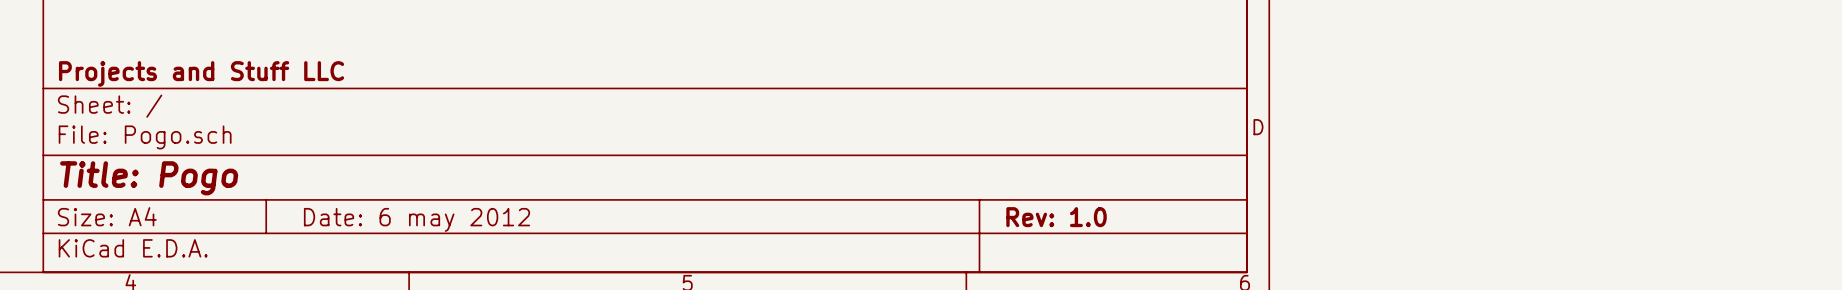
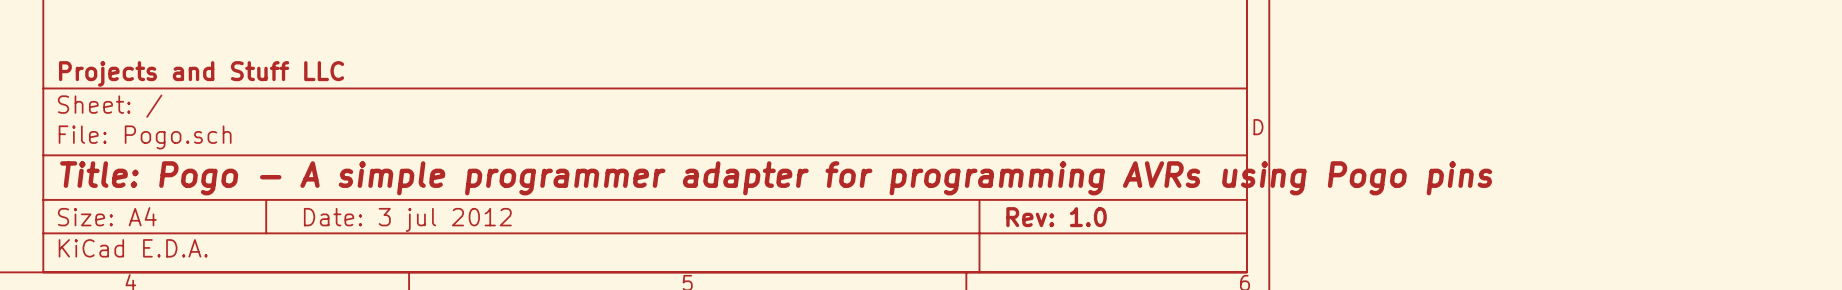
title block: Title: Pogo (149, 178) -> Title: Pogo - A simple programmer adapter for programming AVRs using Pogo pins (776, 178)
title block: Date: 6 may 2012 (416, 219) -> Date: 3 jul 2012 (407, 219)

